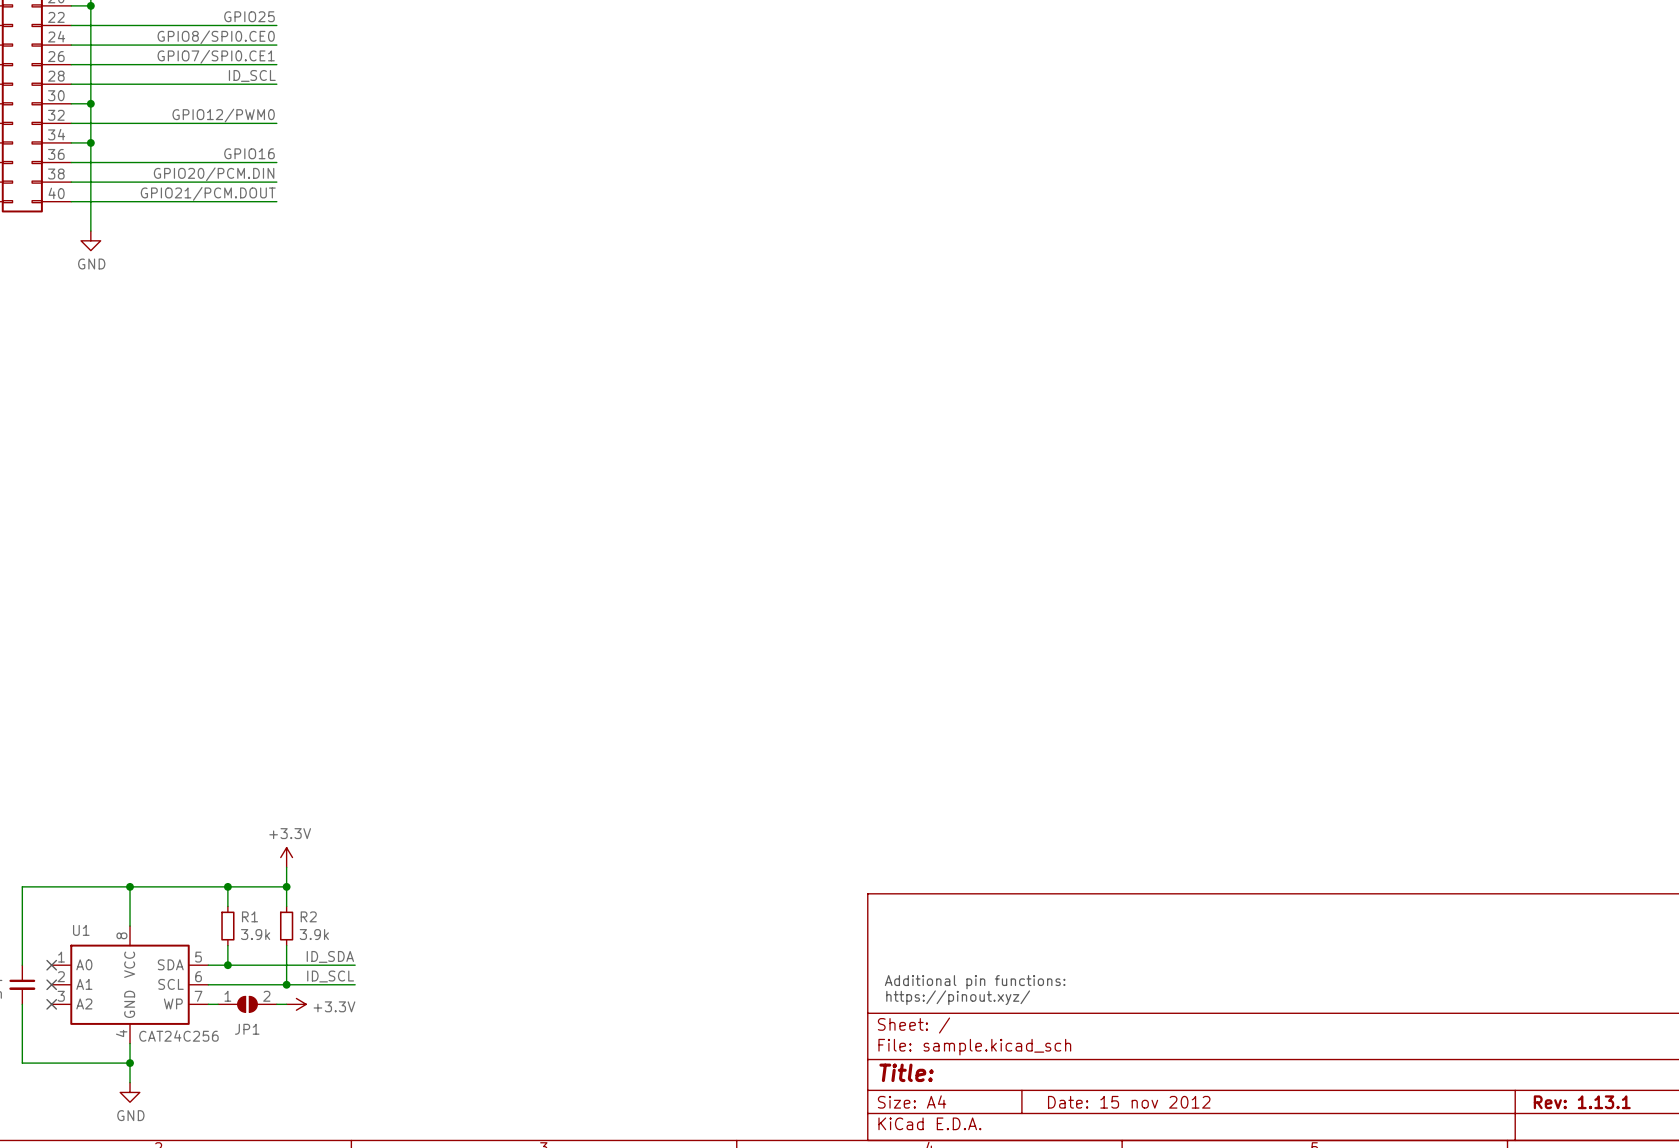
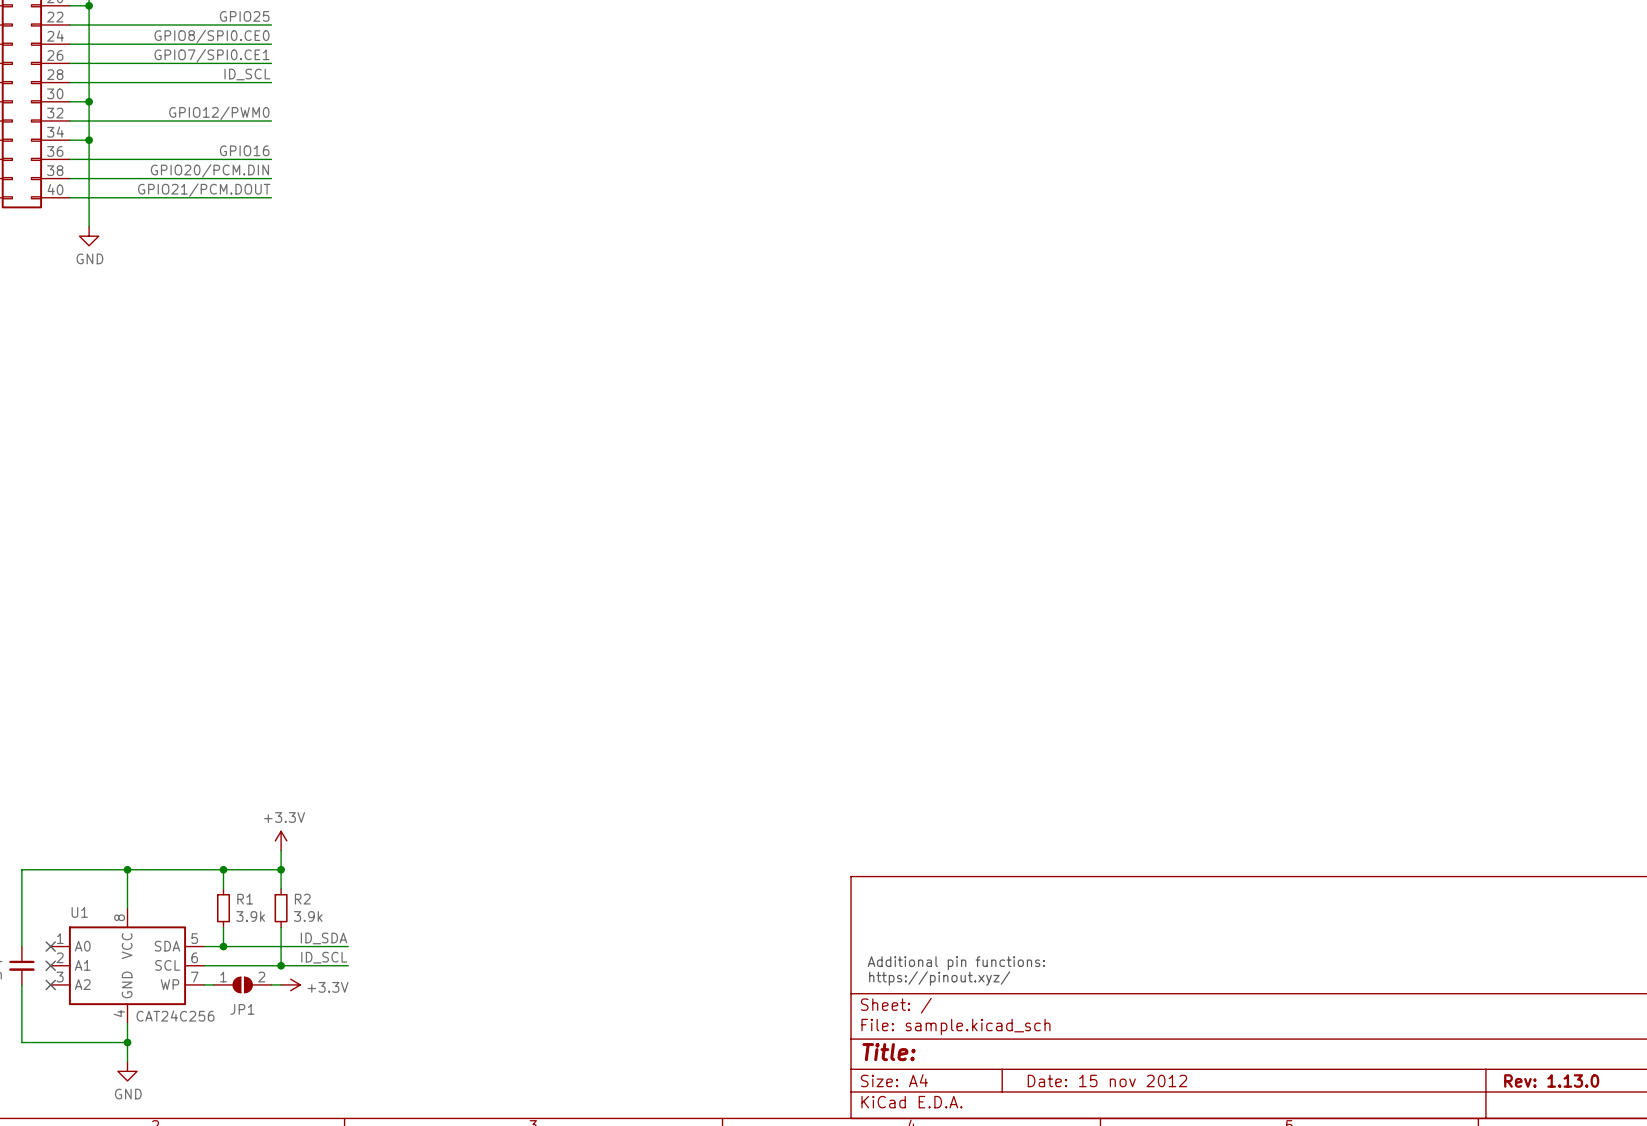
title block: Rev: 1.13.1 (1582, 1102) -> Rev: 1.13.0 (1551, 1080)

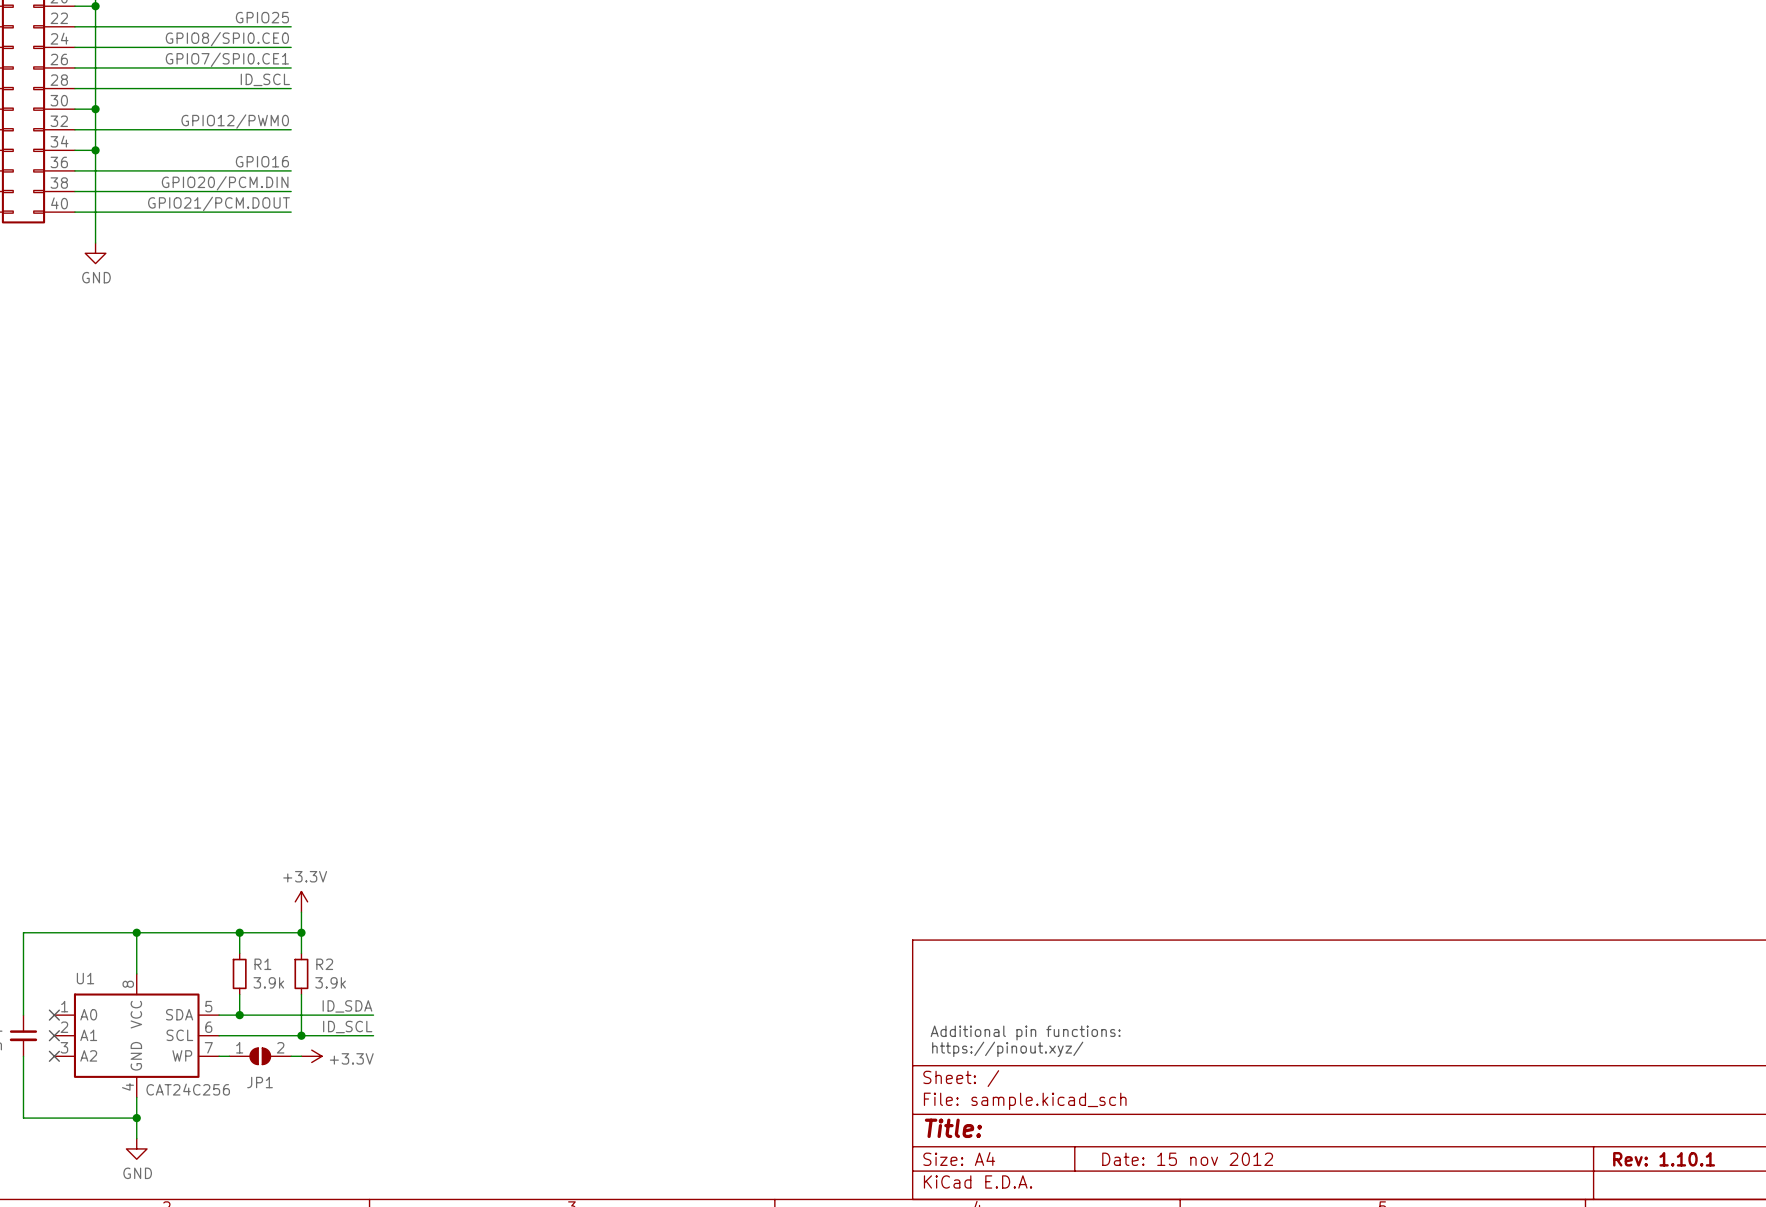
title block: Rev: 1.13.0 (1551, 1080) -> Rev: 1.10.1 (1664, 1159)

